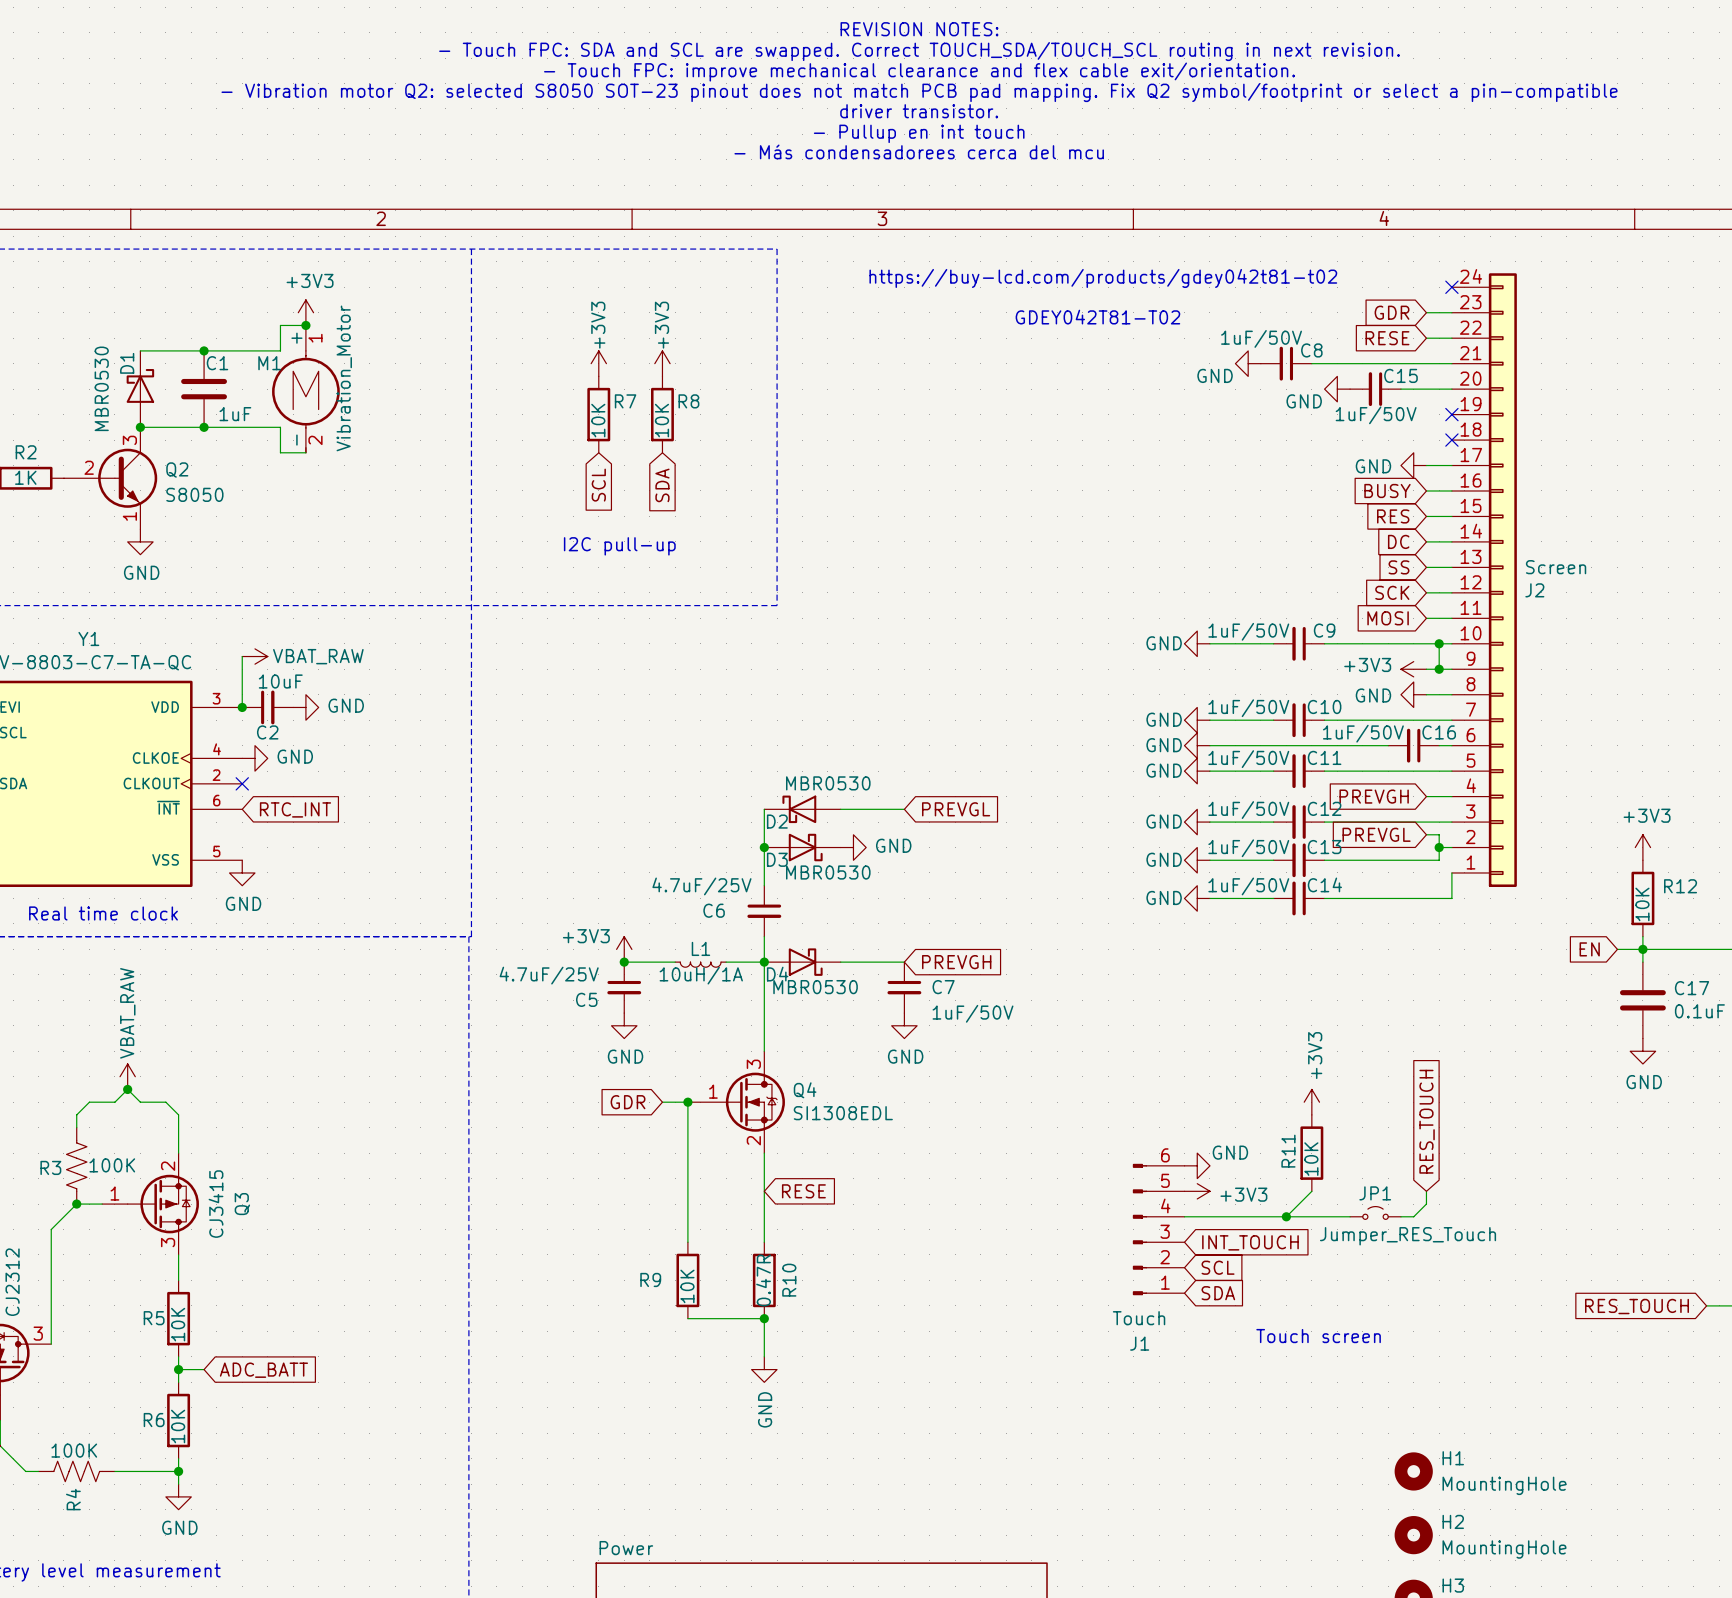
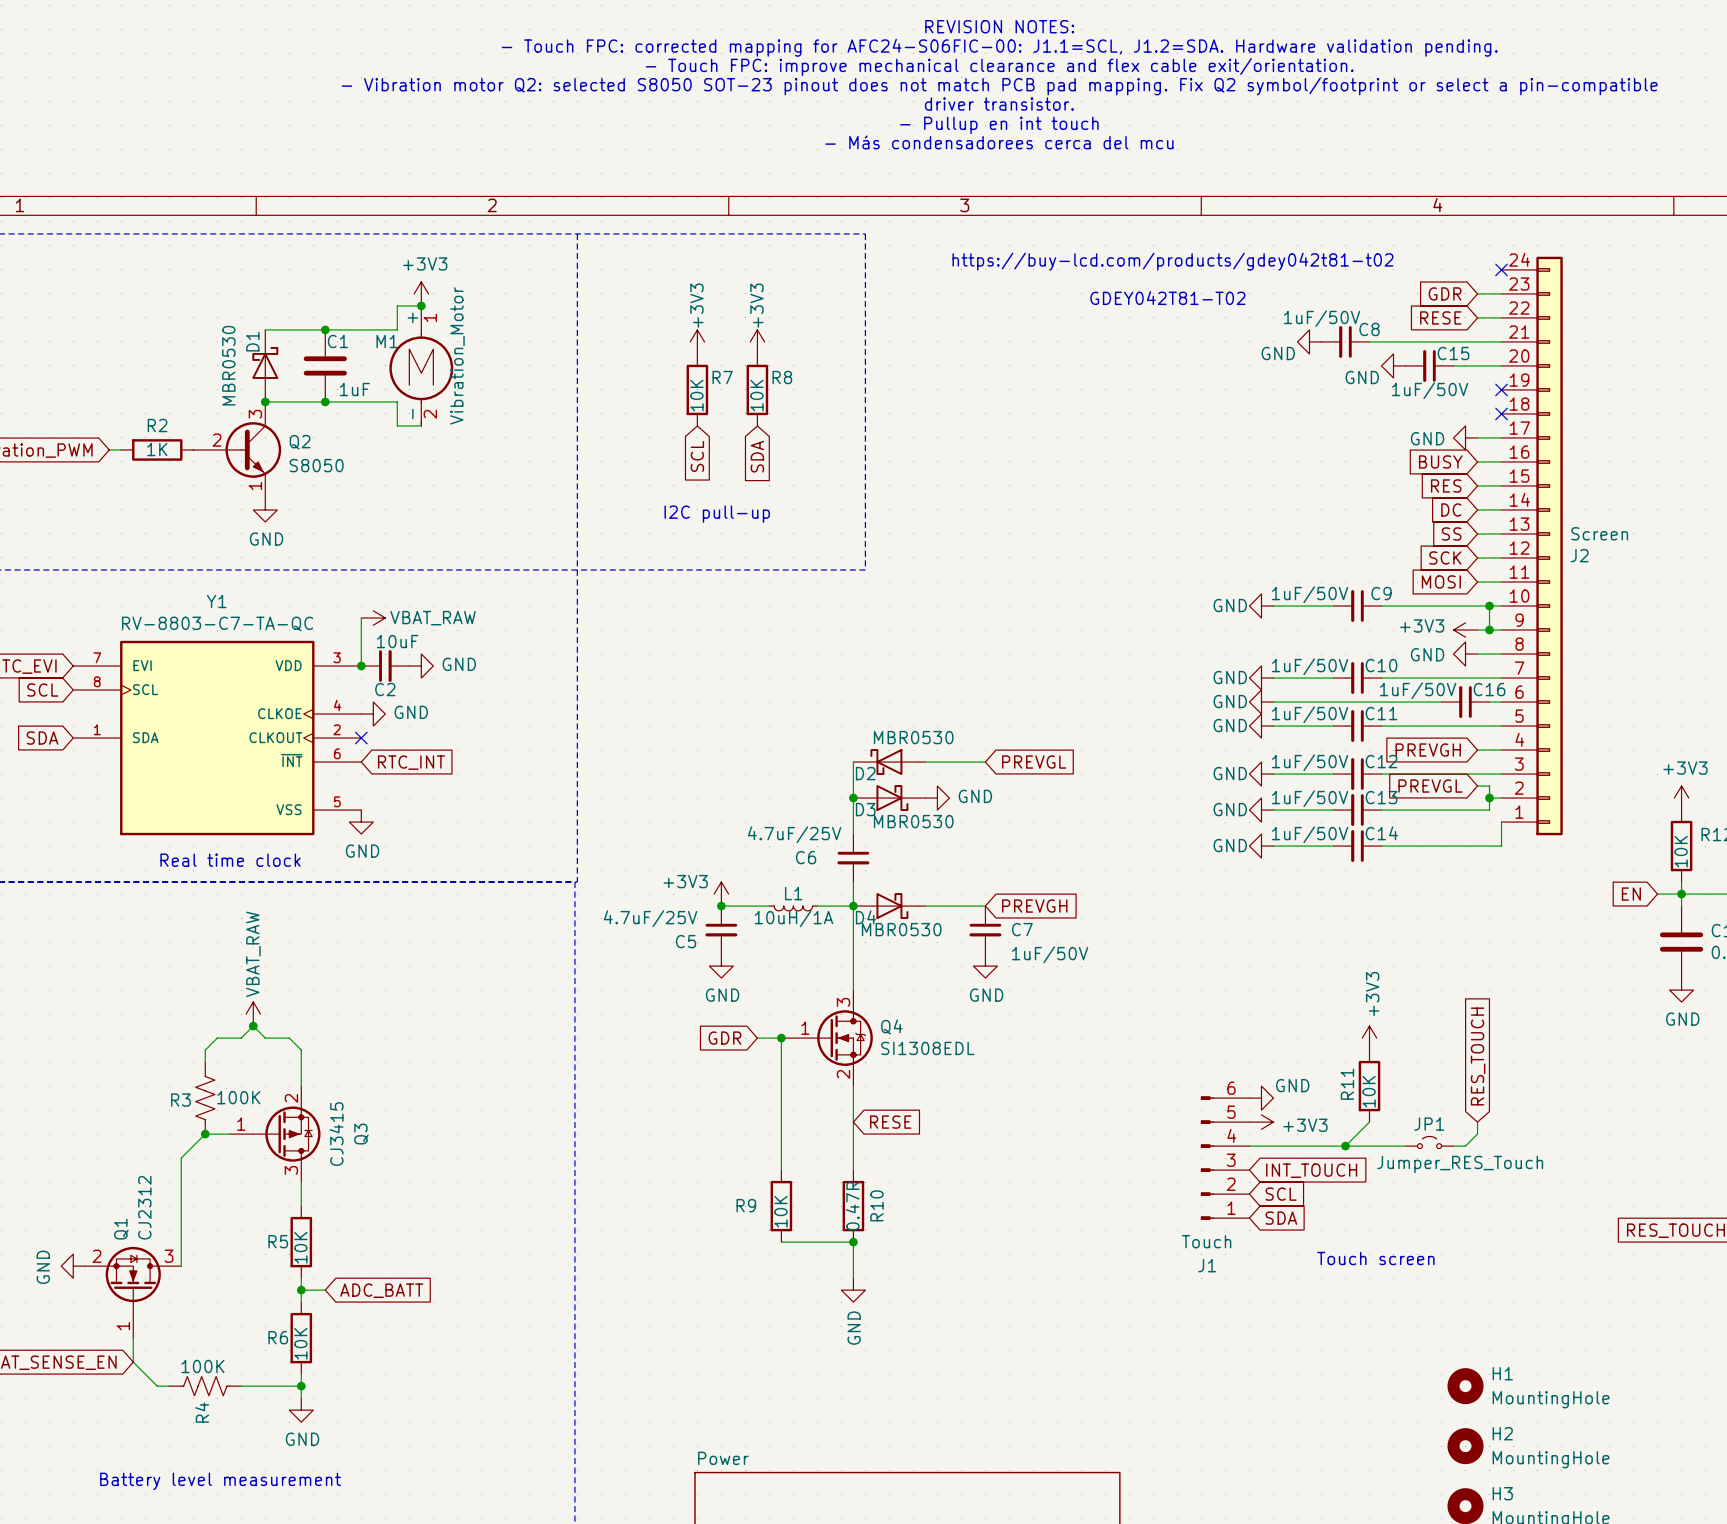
text: - Touch FPC: SDA and SCL are swapped. Correct TOUCH_SDA/TOUCH_SCL routing in next revision. (919, 51) -> - Touch FPC: corrected mapping for AFC24-S06FIC-00: J1.1=SCL, J1.2=SDA. Hardware validation pending. (999, 47)

